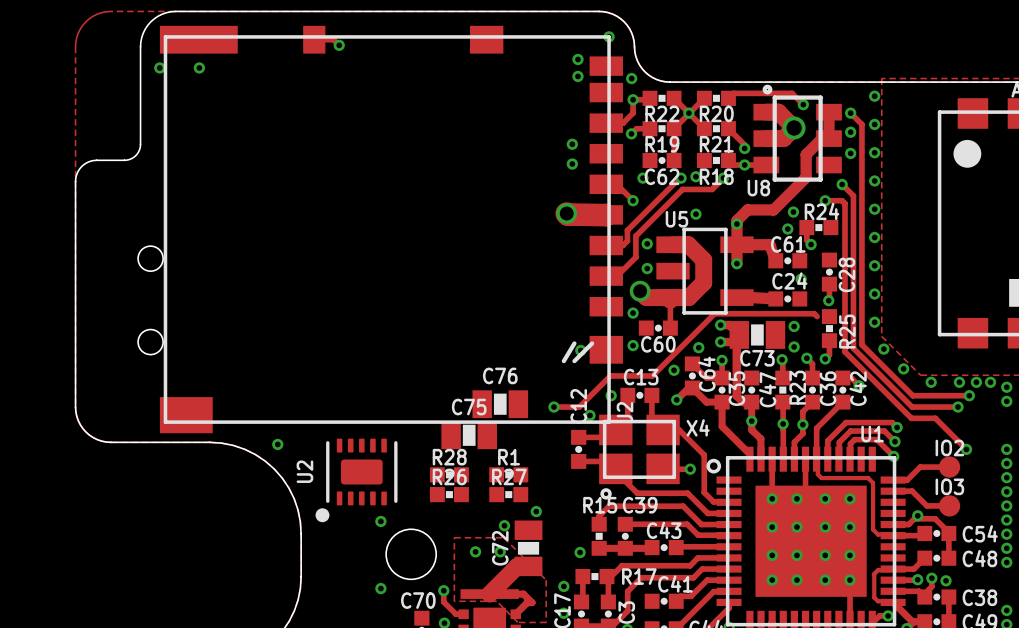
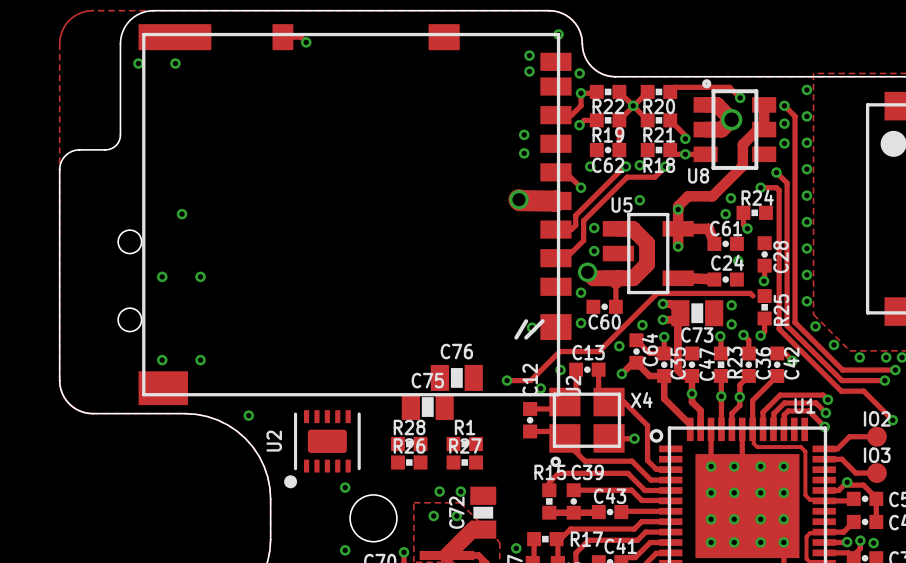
via: none -> (182, 214)
via: none -> (162, 276)
via: none -> (200, 276)
via: none -> (162, 360)
via: none -> (200, 360)
via: (536, 511) -> none
via: none -> (439, 491)
via: (580, 552) -> none

